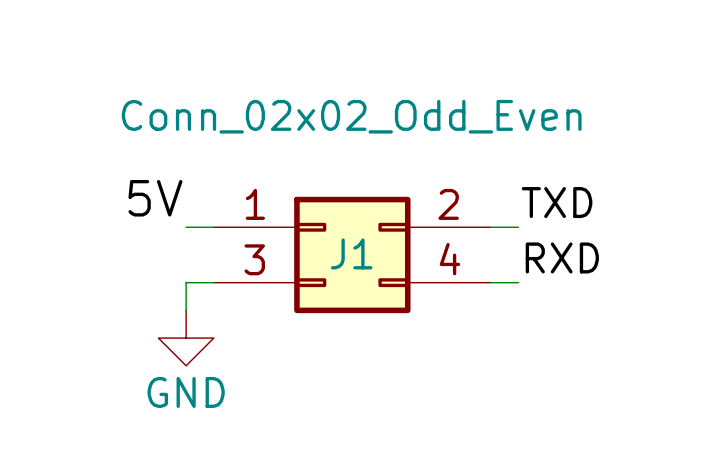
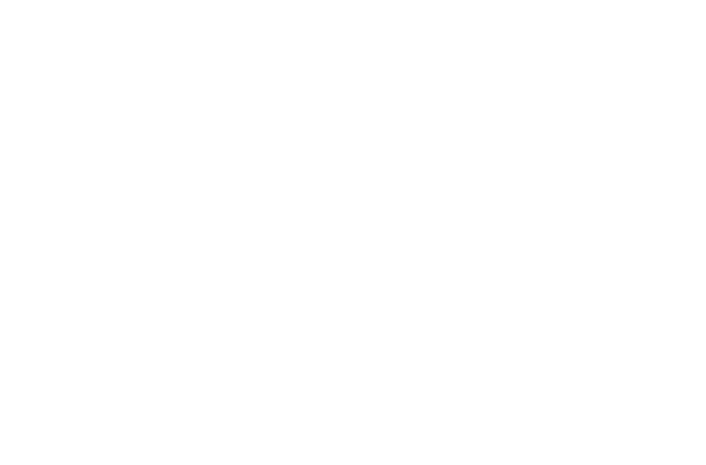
label: 5V (155, 198) -> none
label: TXD (557, 202) -> none
wire: (186, 227) (213, 227) -> none
wire: (490, 227) (518, 227) -> none
J1: Conn_02x02_Odd_Even (352, 254) -> none
label: RXD (562, 257) -> none
wire: (213, 282) (186, 282) (186, 310) -> none
wire: (490, 282) (518, 282) -> none
power symbol: GND (186, 338) -> none

